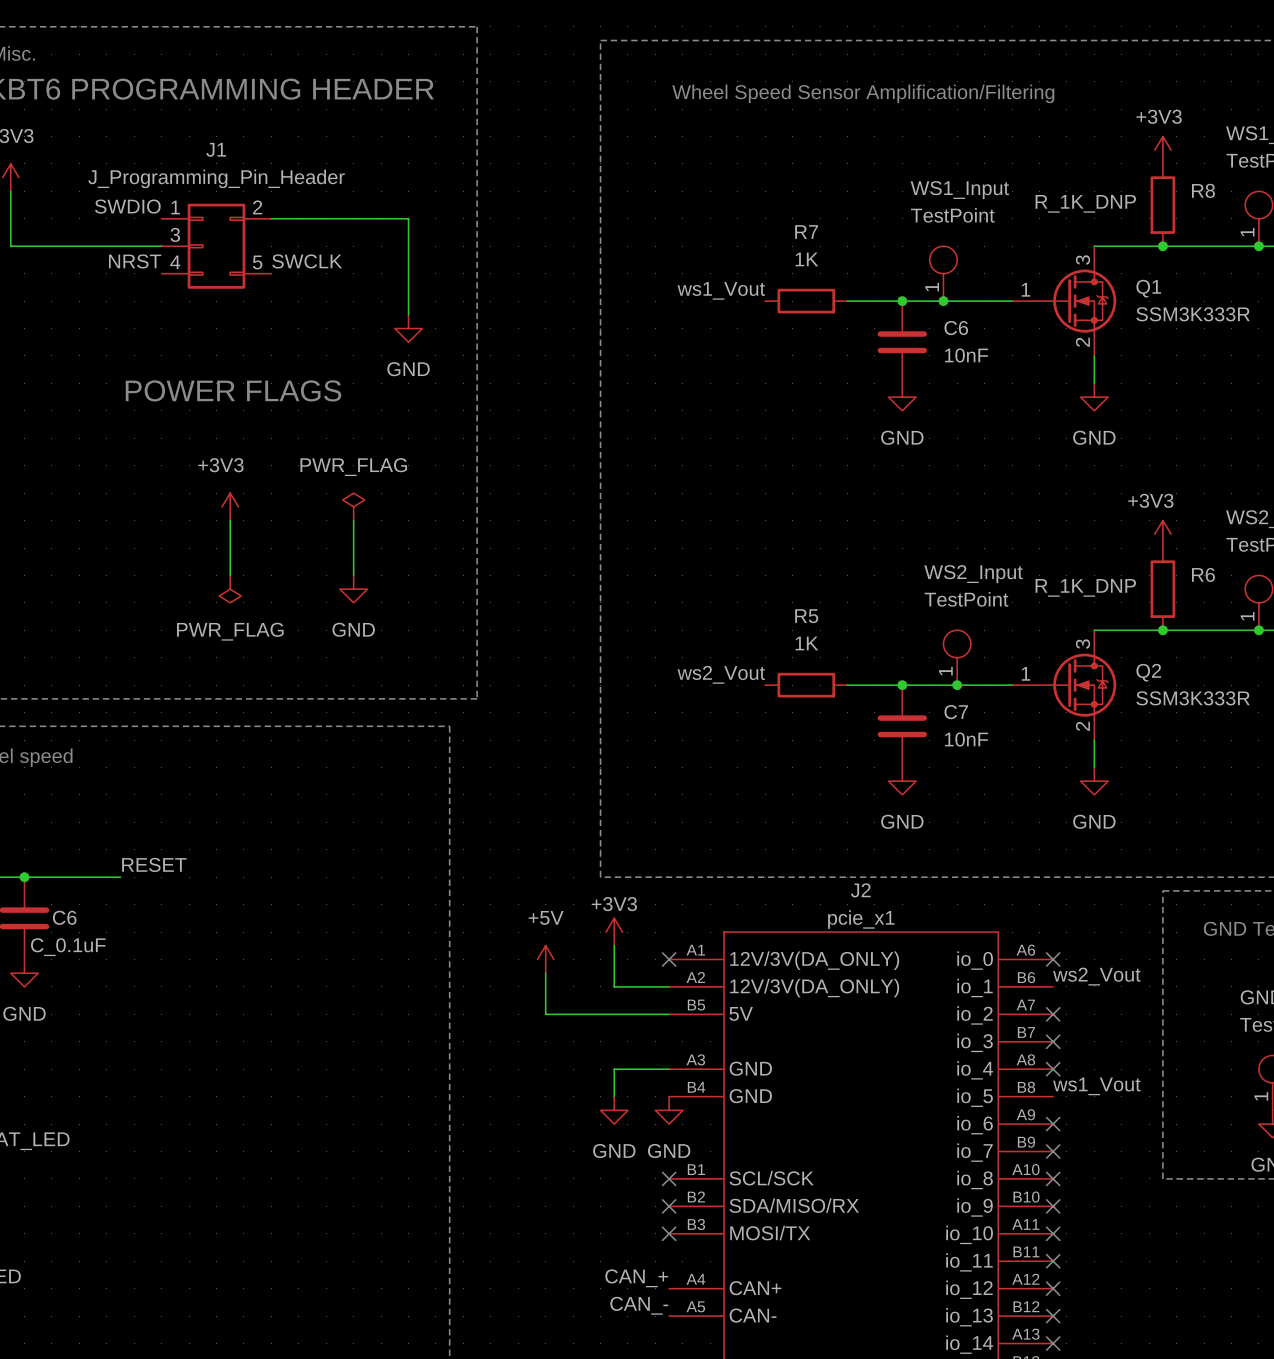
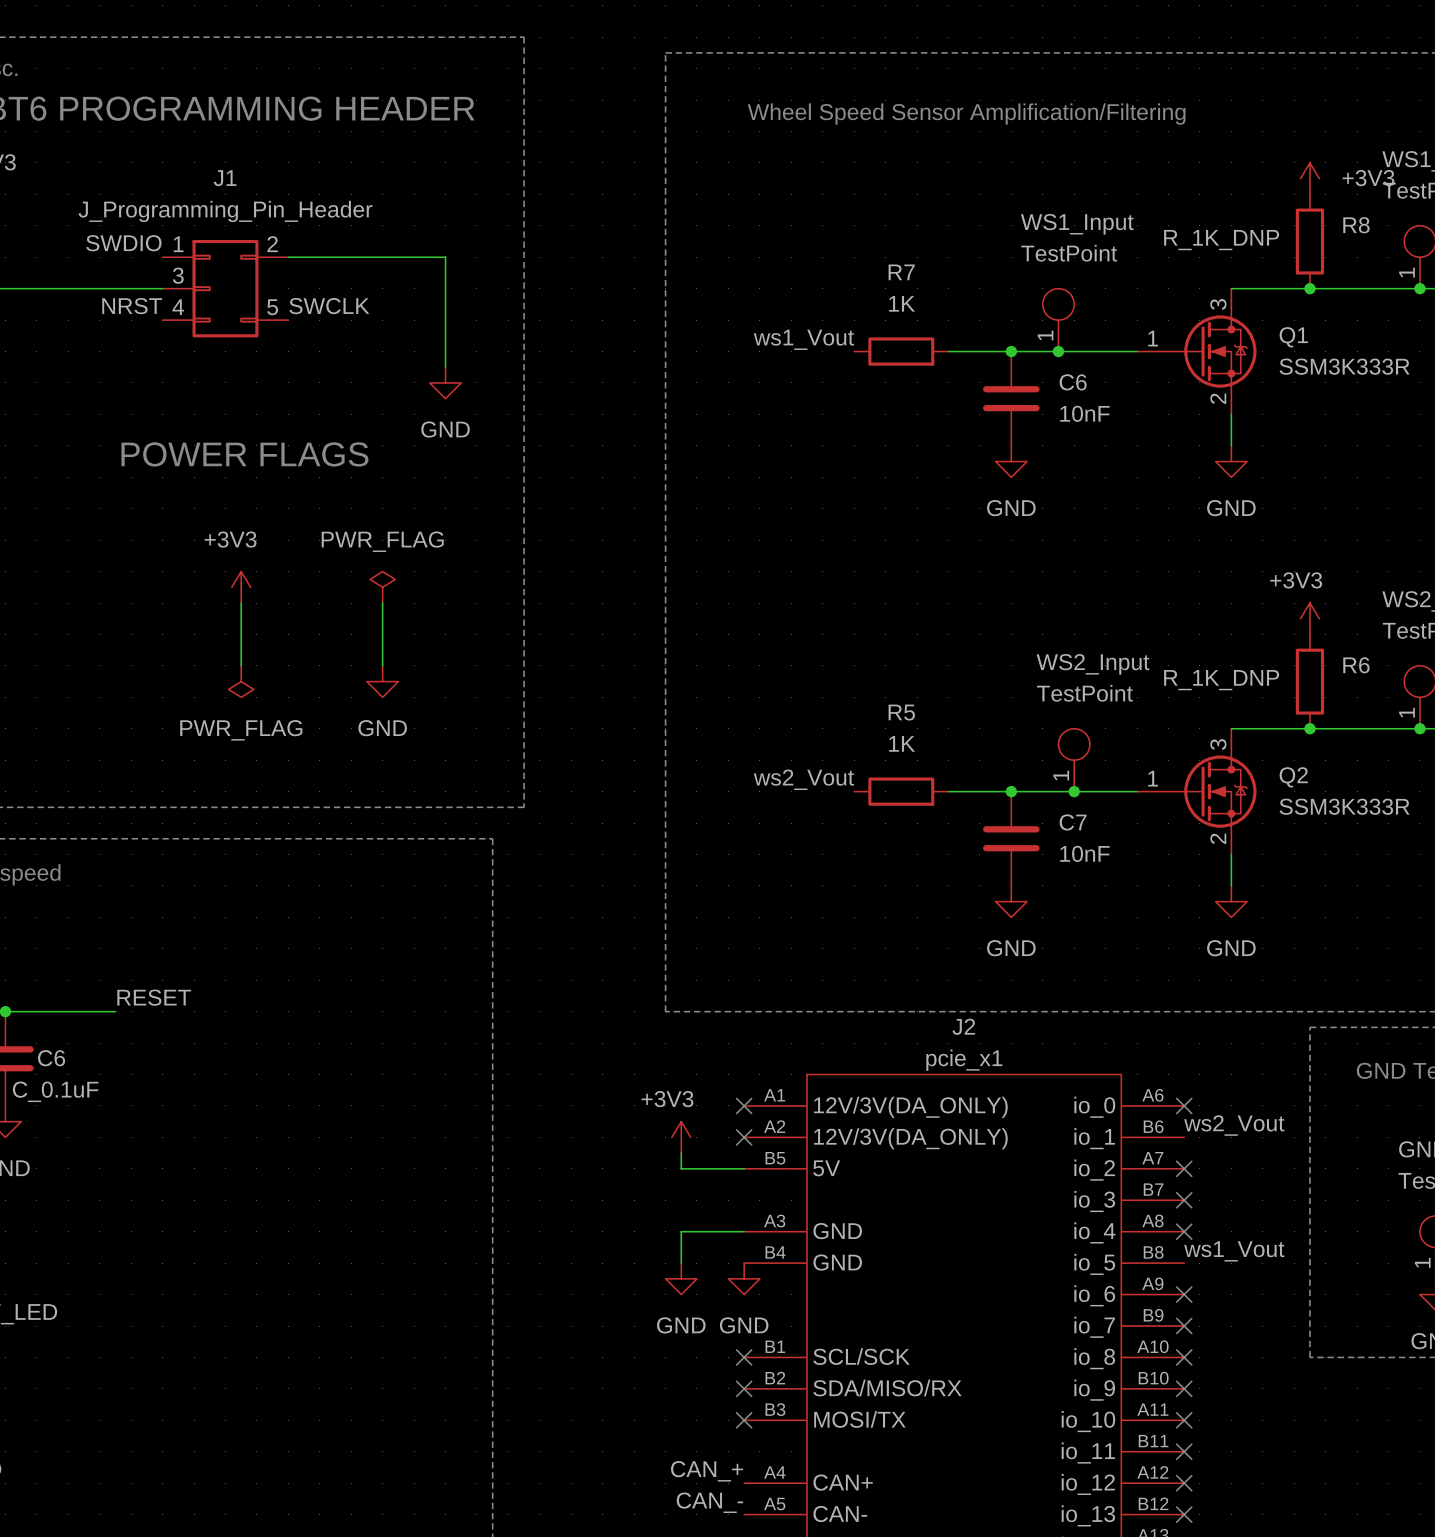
power symbol text position: +3V3 (1159, 116) -> +3V3 (1368, 178)
power symbol text position: +3V3 (614, 904) -> +3V3 (667, 1099)
power symbol position: +3V3 (614, 932) -> +3V3 (681, 1137)
wire: (614, 945) (614, 986) (669, 986) -> none
power symbol: +5V (545, 959) -> none
wire: (545, 973) (545, 1014) (614, 1014) -> (681, 1153) (681, 1168)
no-connect mark: none -> (744, 1137)

